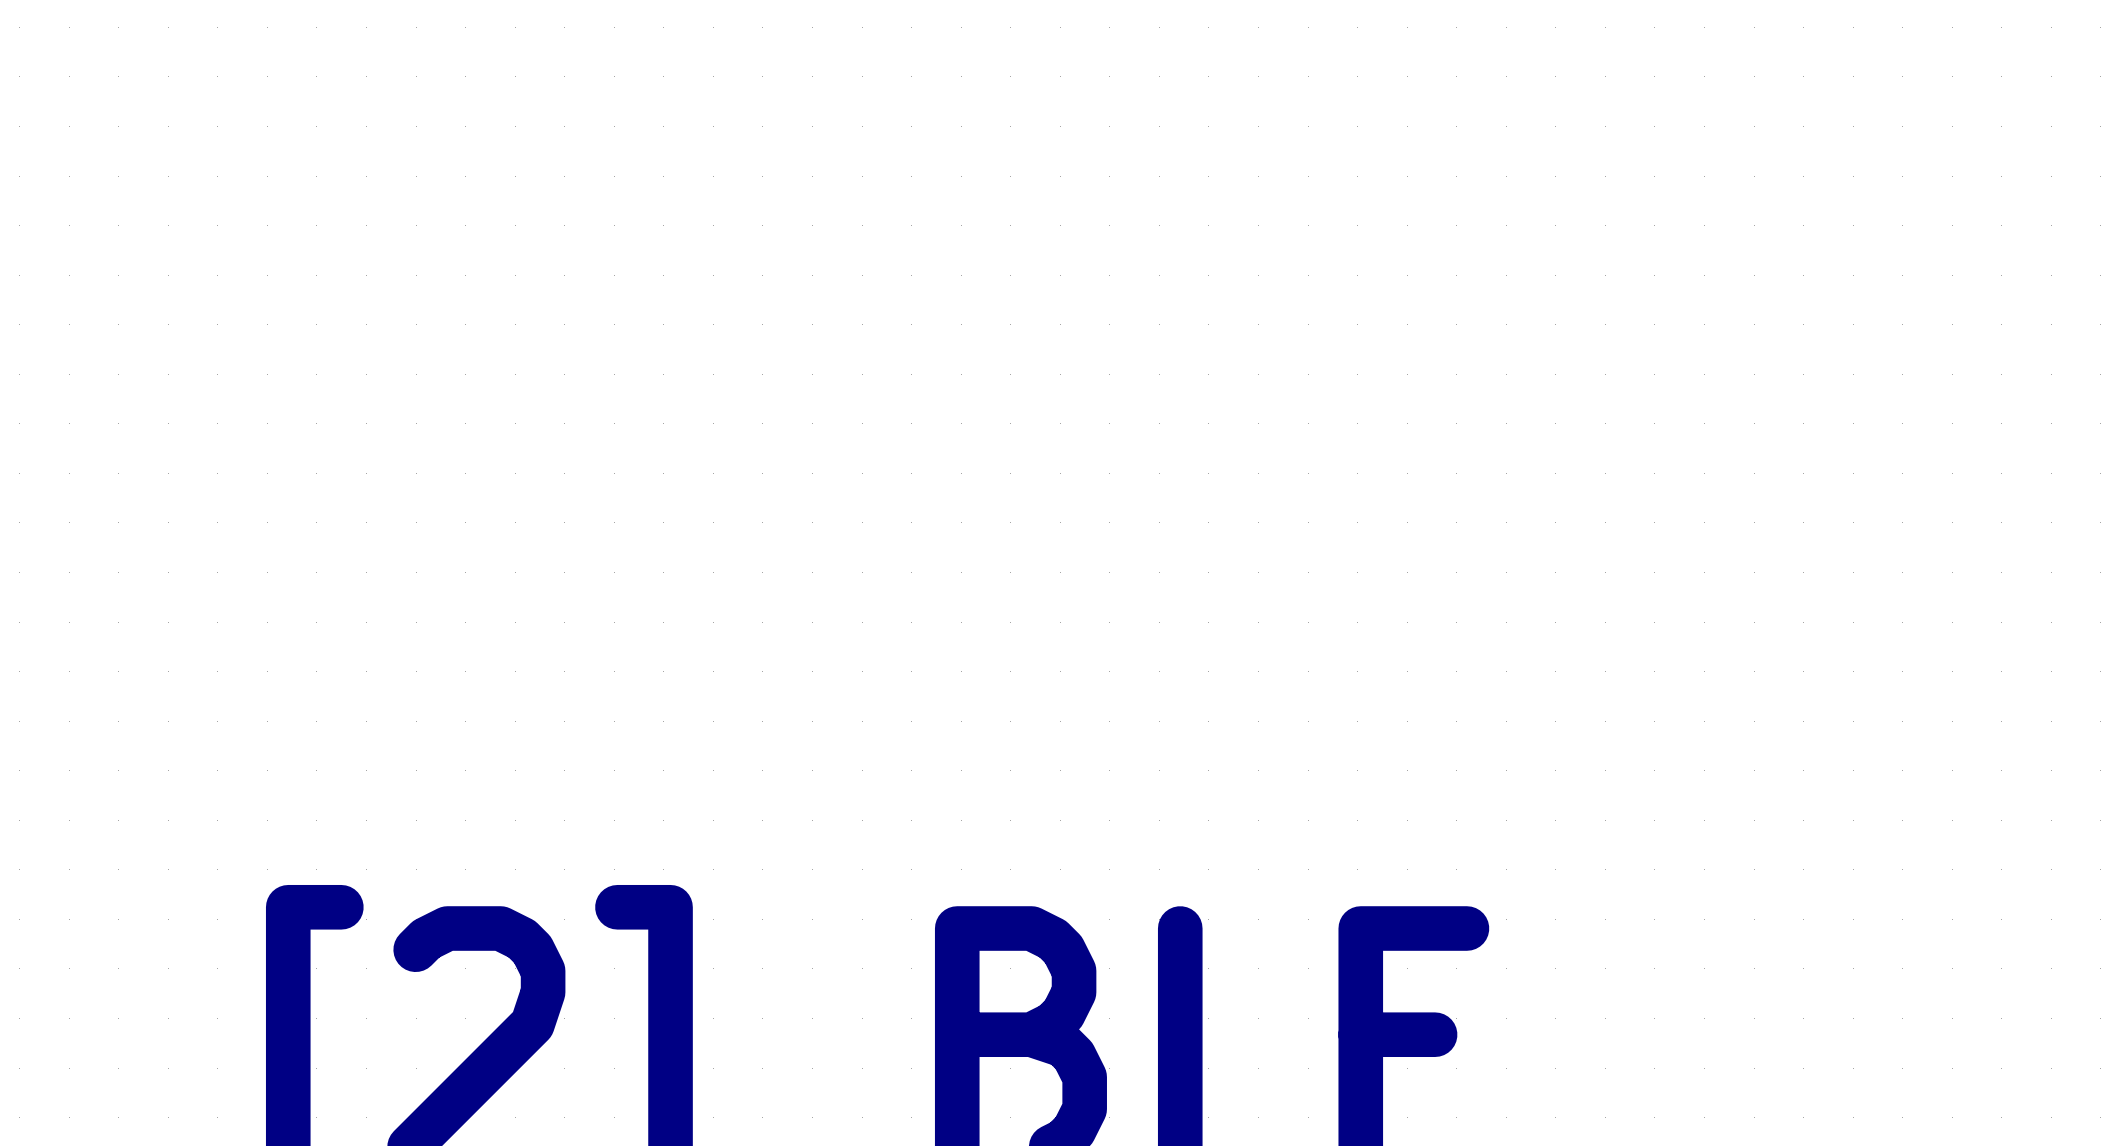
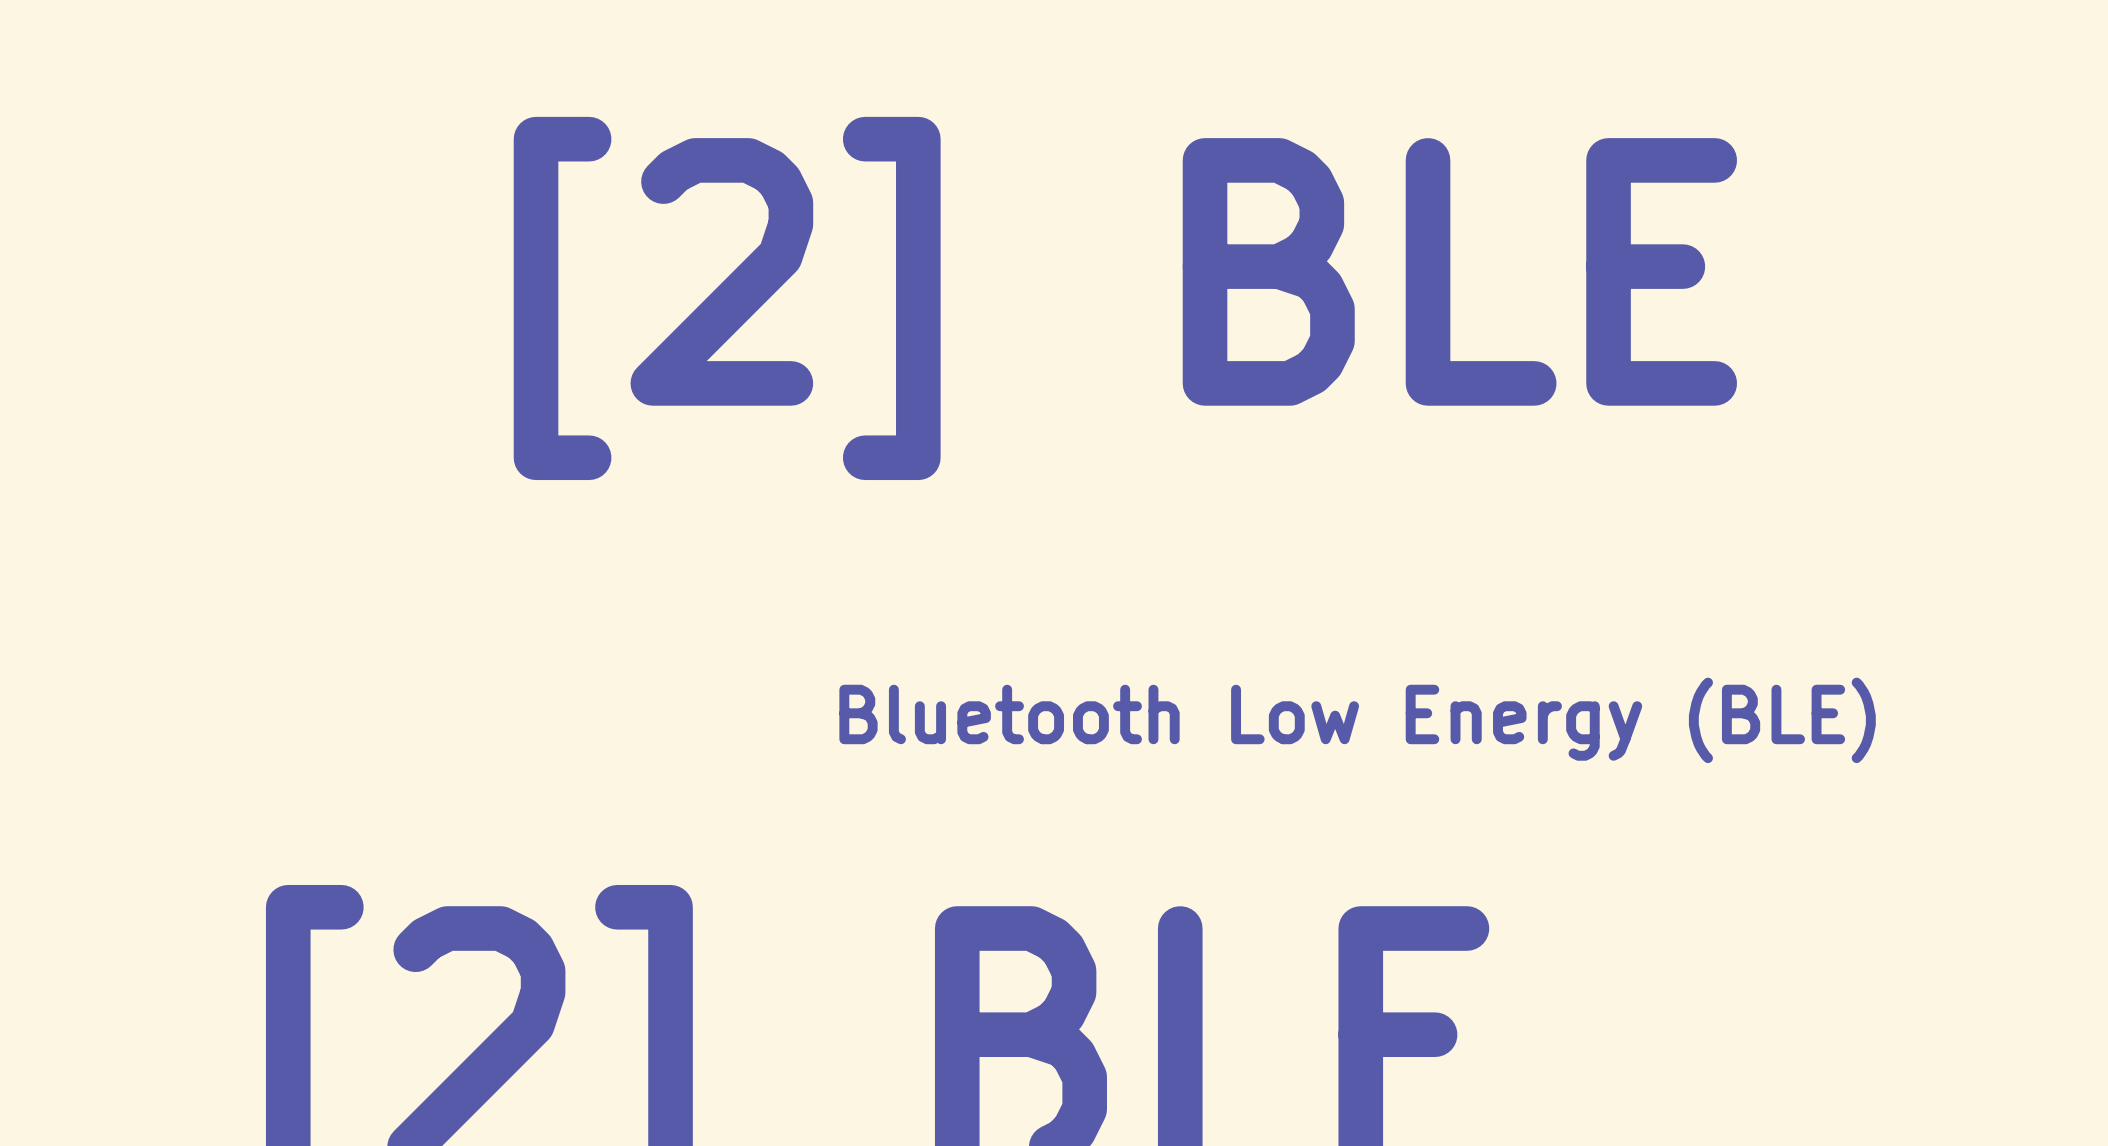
text: none -> [2] BLE (1125, 298)
text: none -> Bluetooth Low Energy (BLE) (1357, 720)

